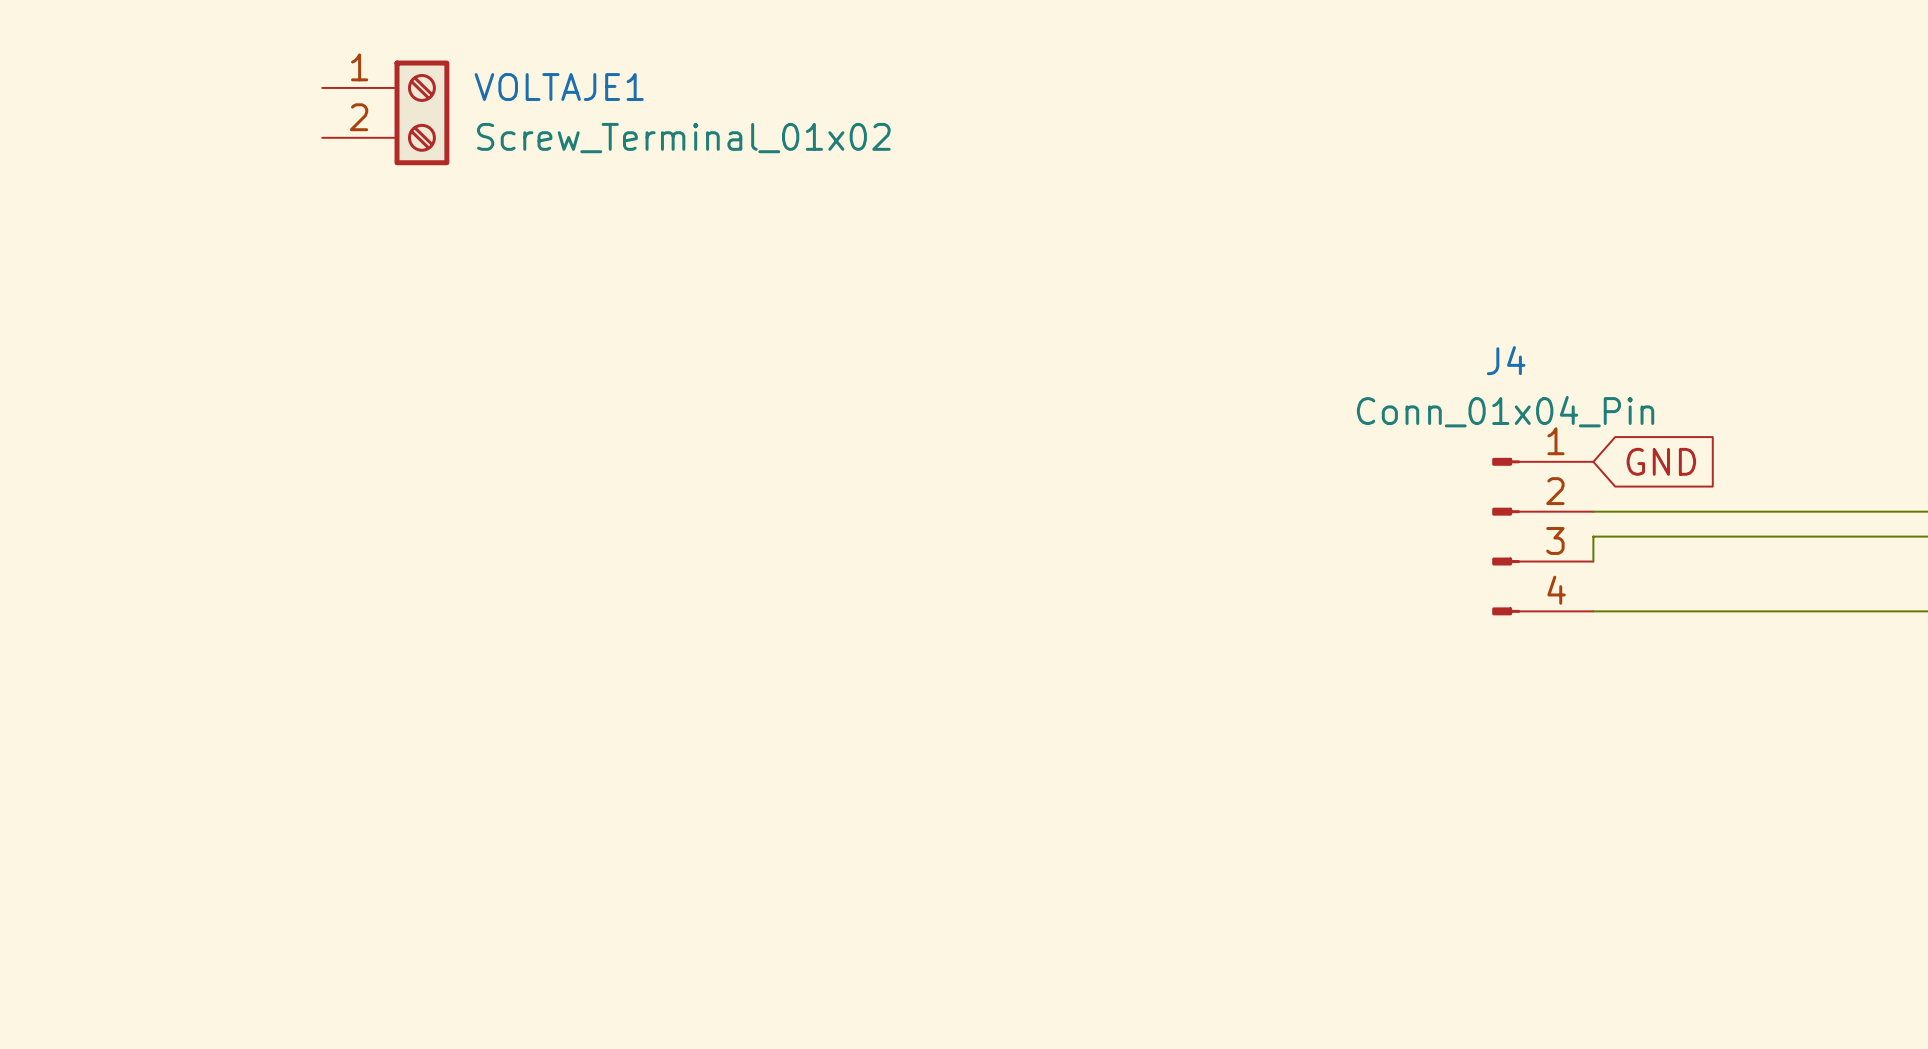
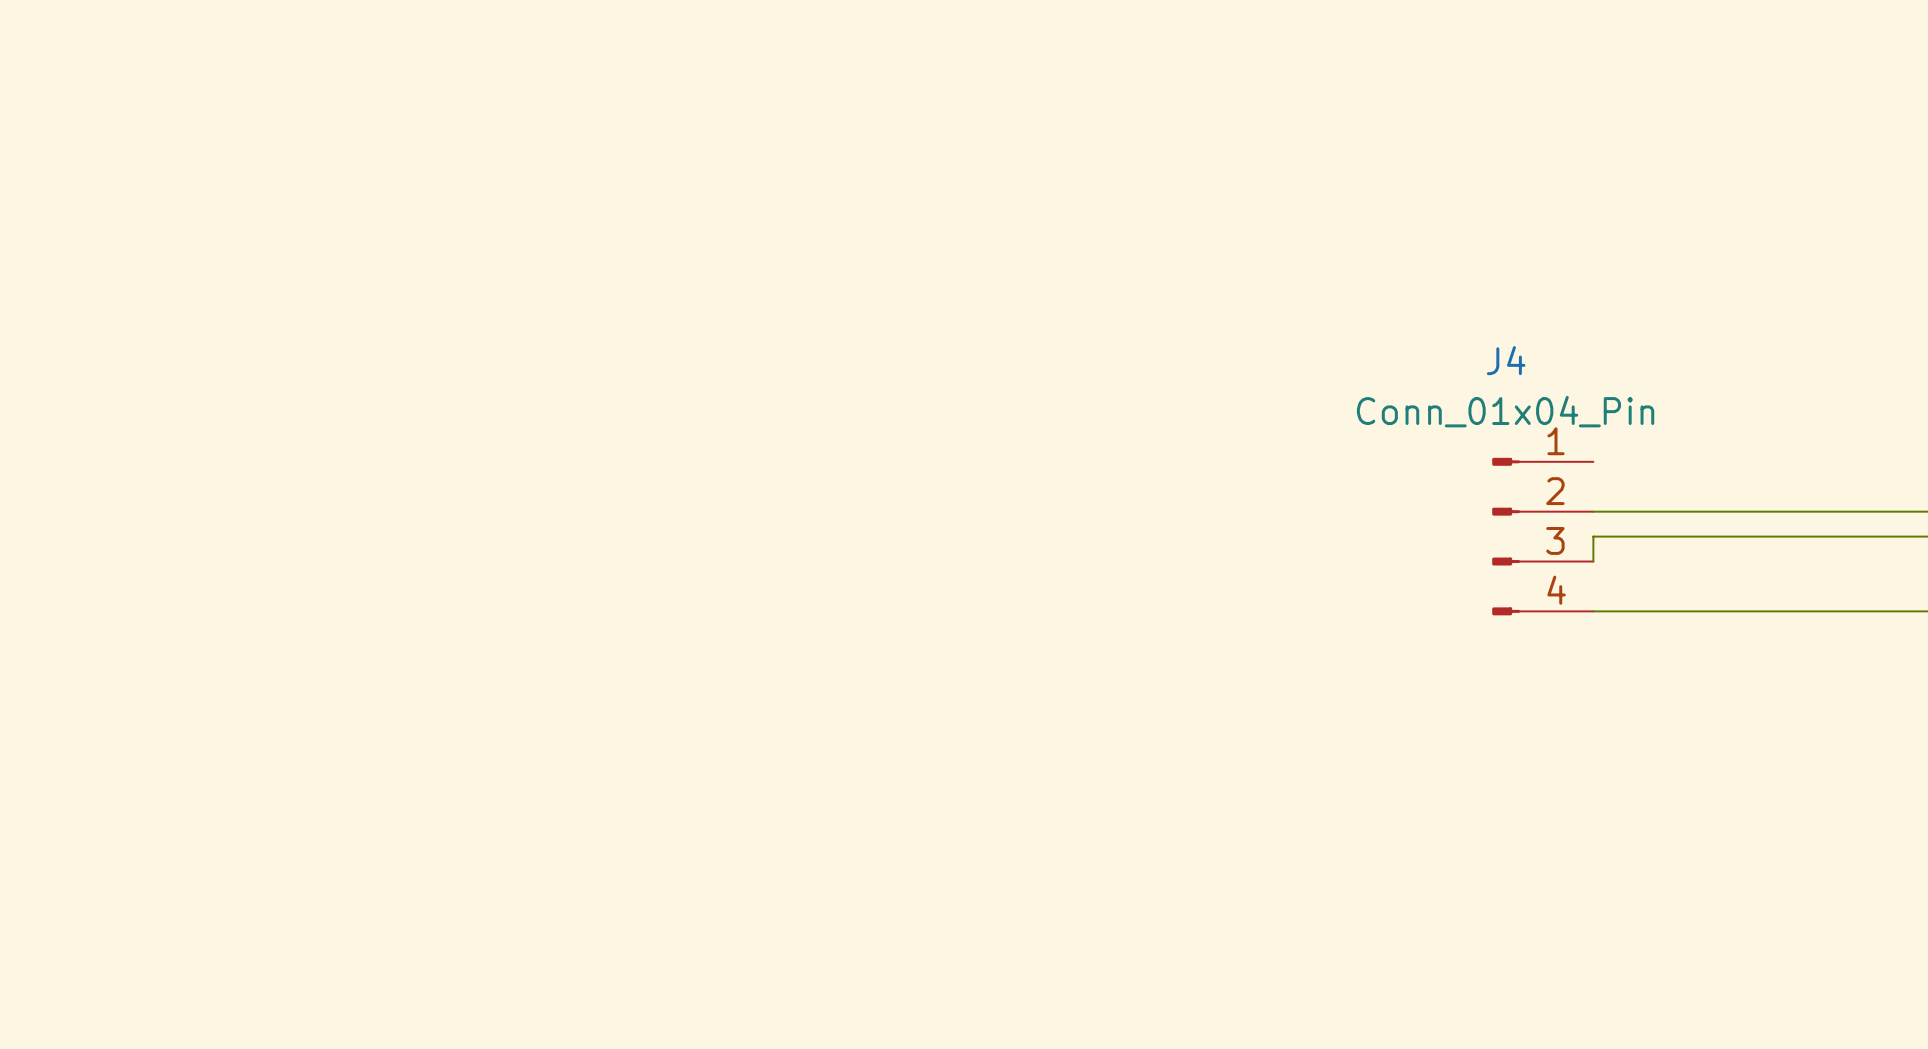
VOLTAJE1: Screw_Terminal_01x02 (385, 112) -> none
global label: GND (1661, 461) -> none

